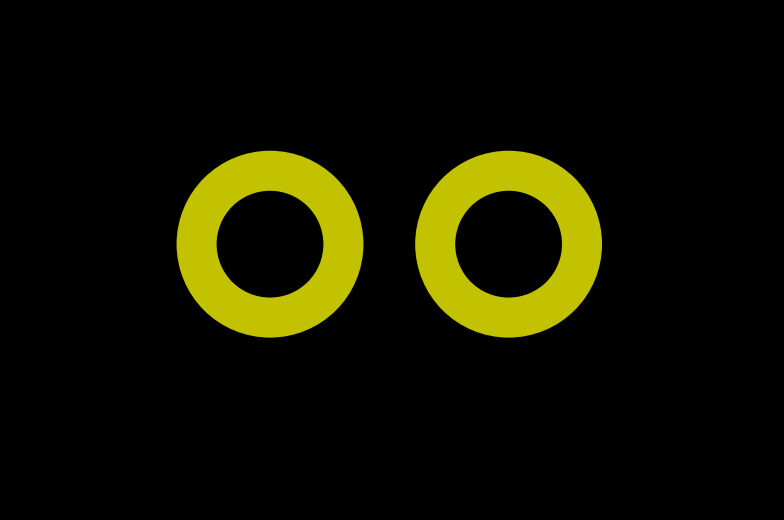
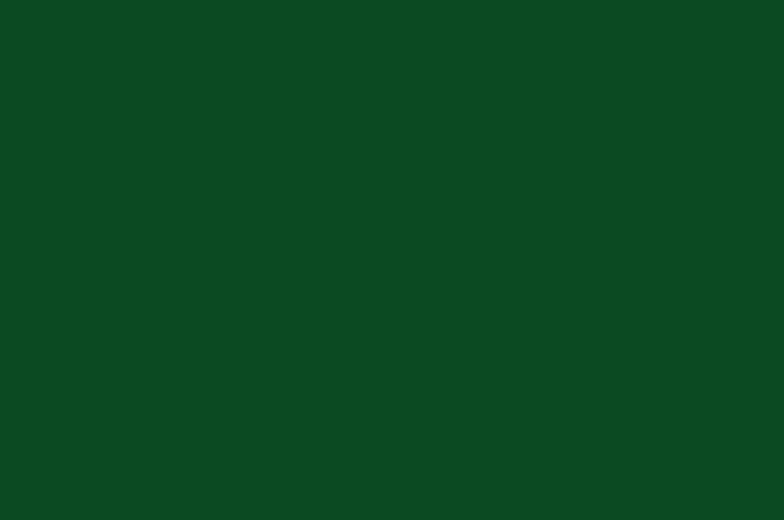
part: (270, 244) -> none
part: (508, 244) -> none

